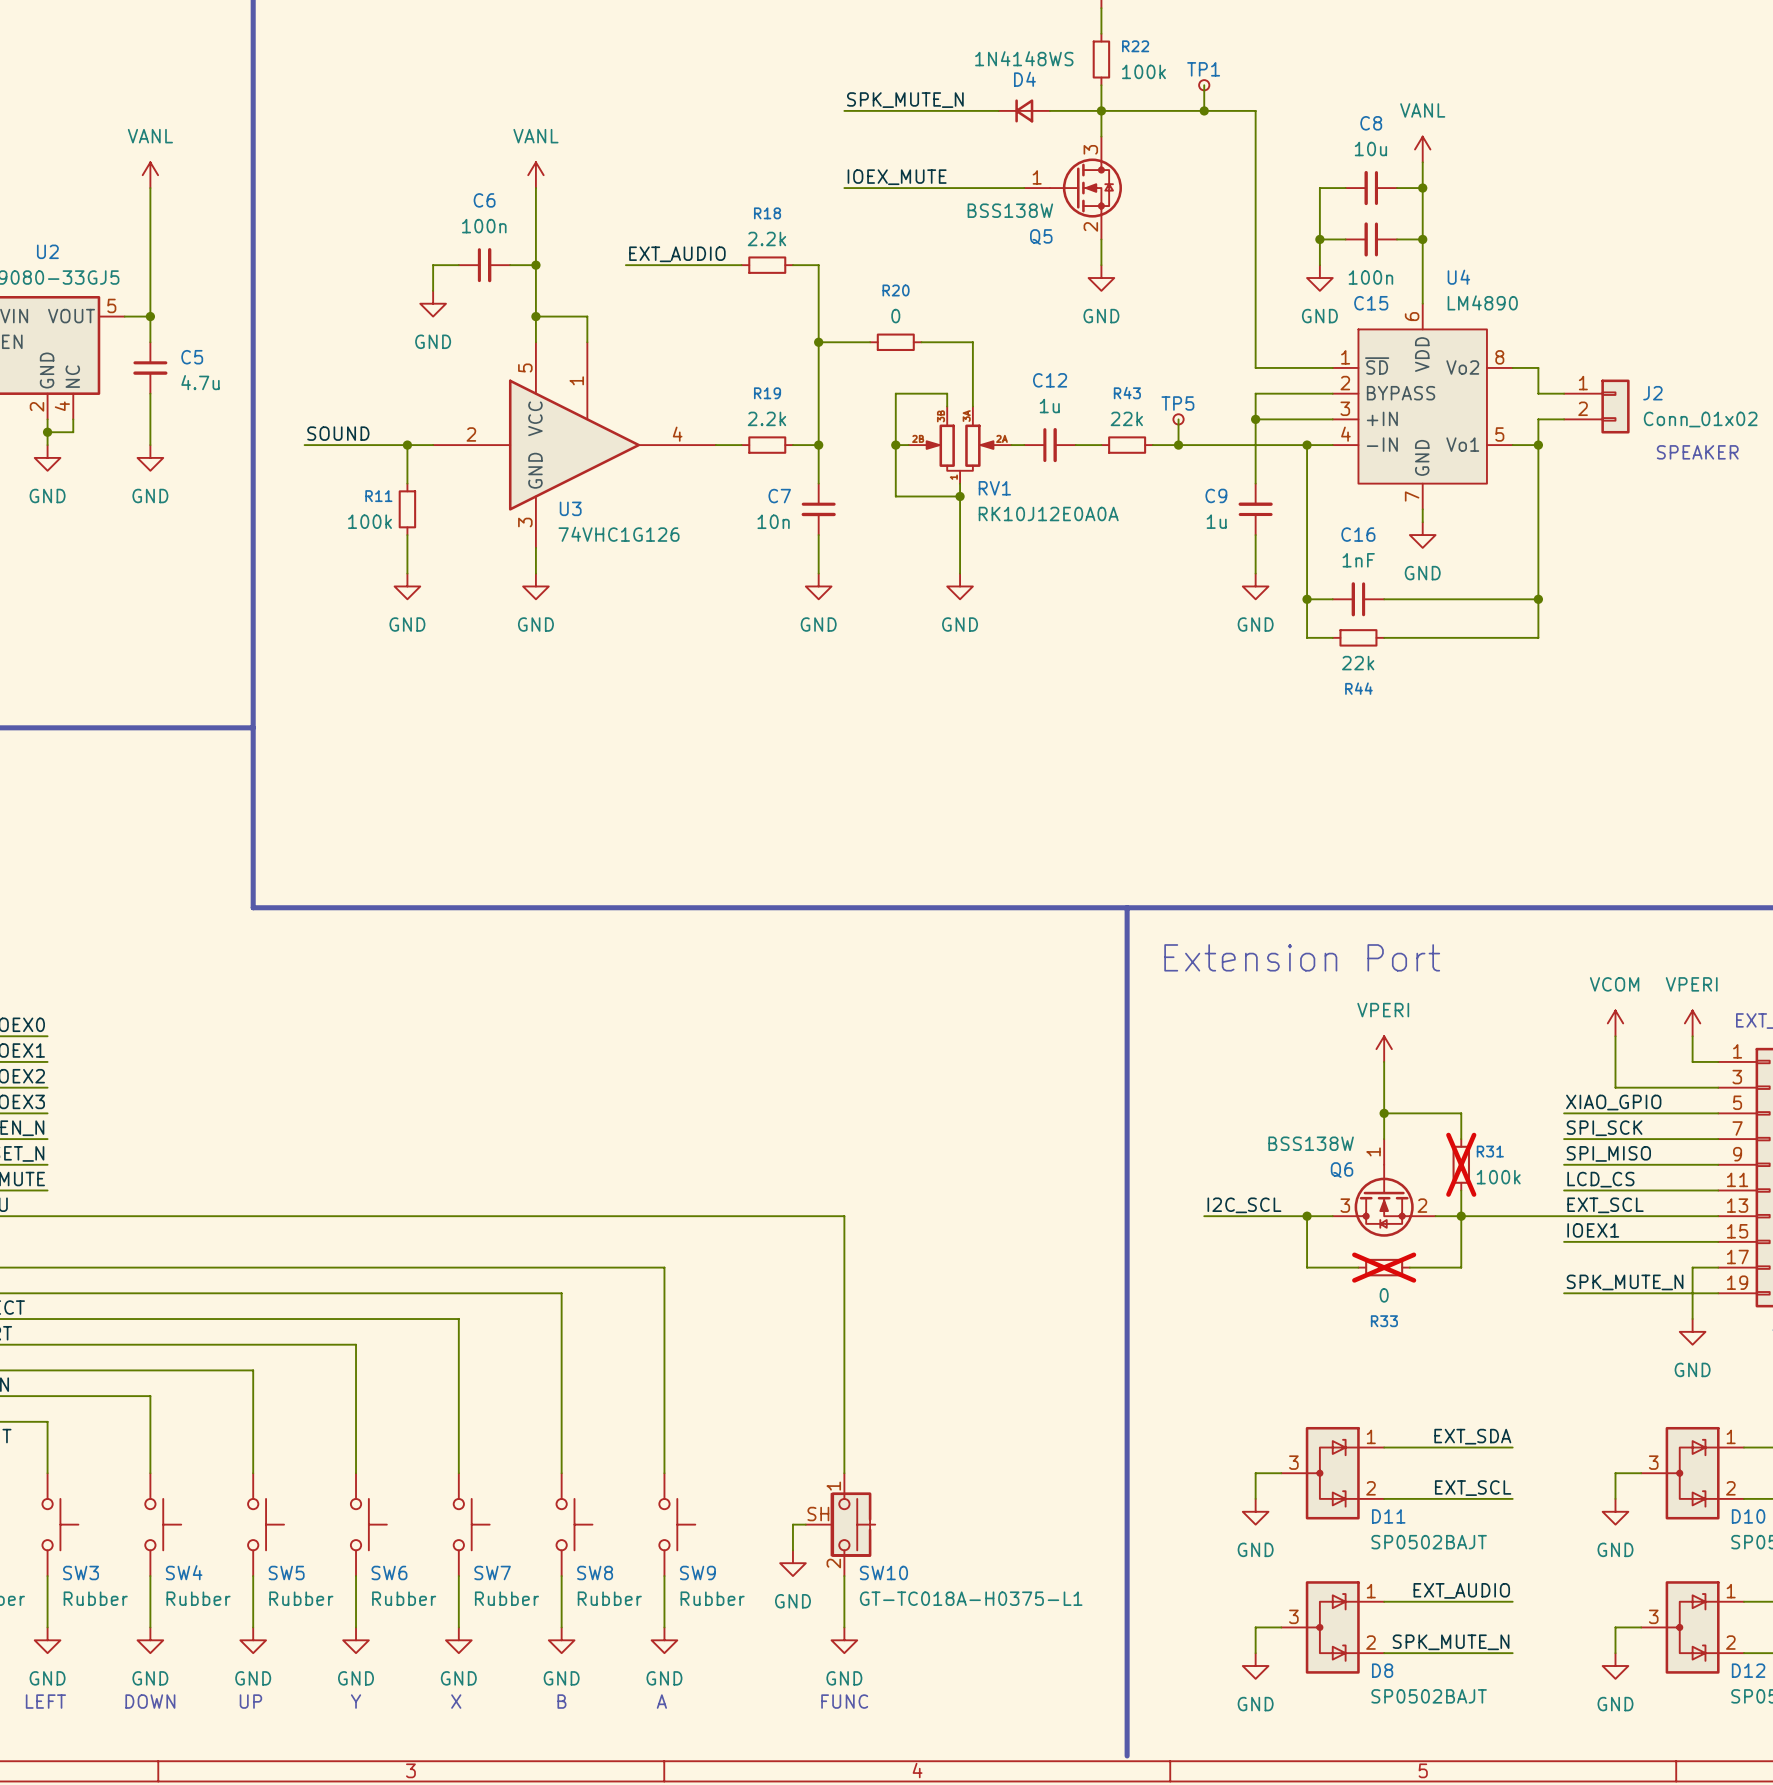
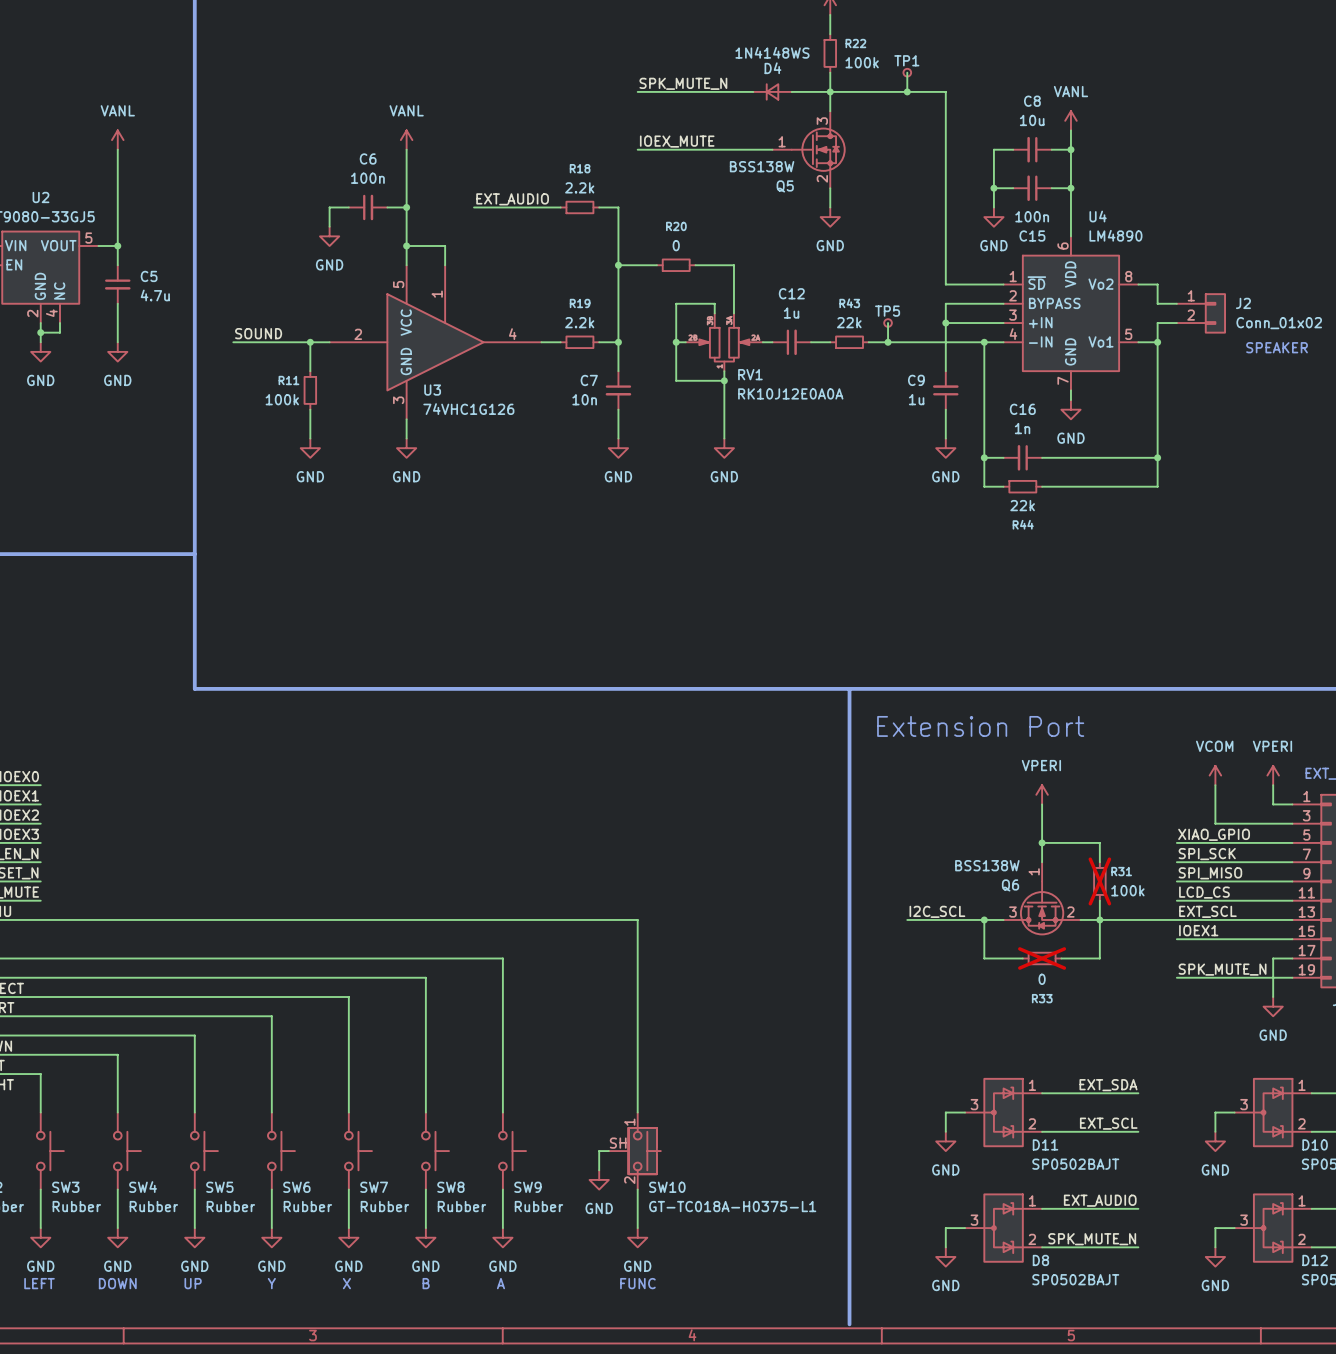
C16 value: 1nF (1358, 560) -> 1n (1022, 428)

